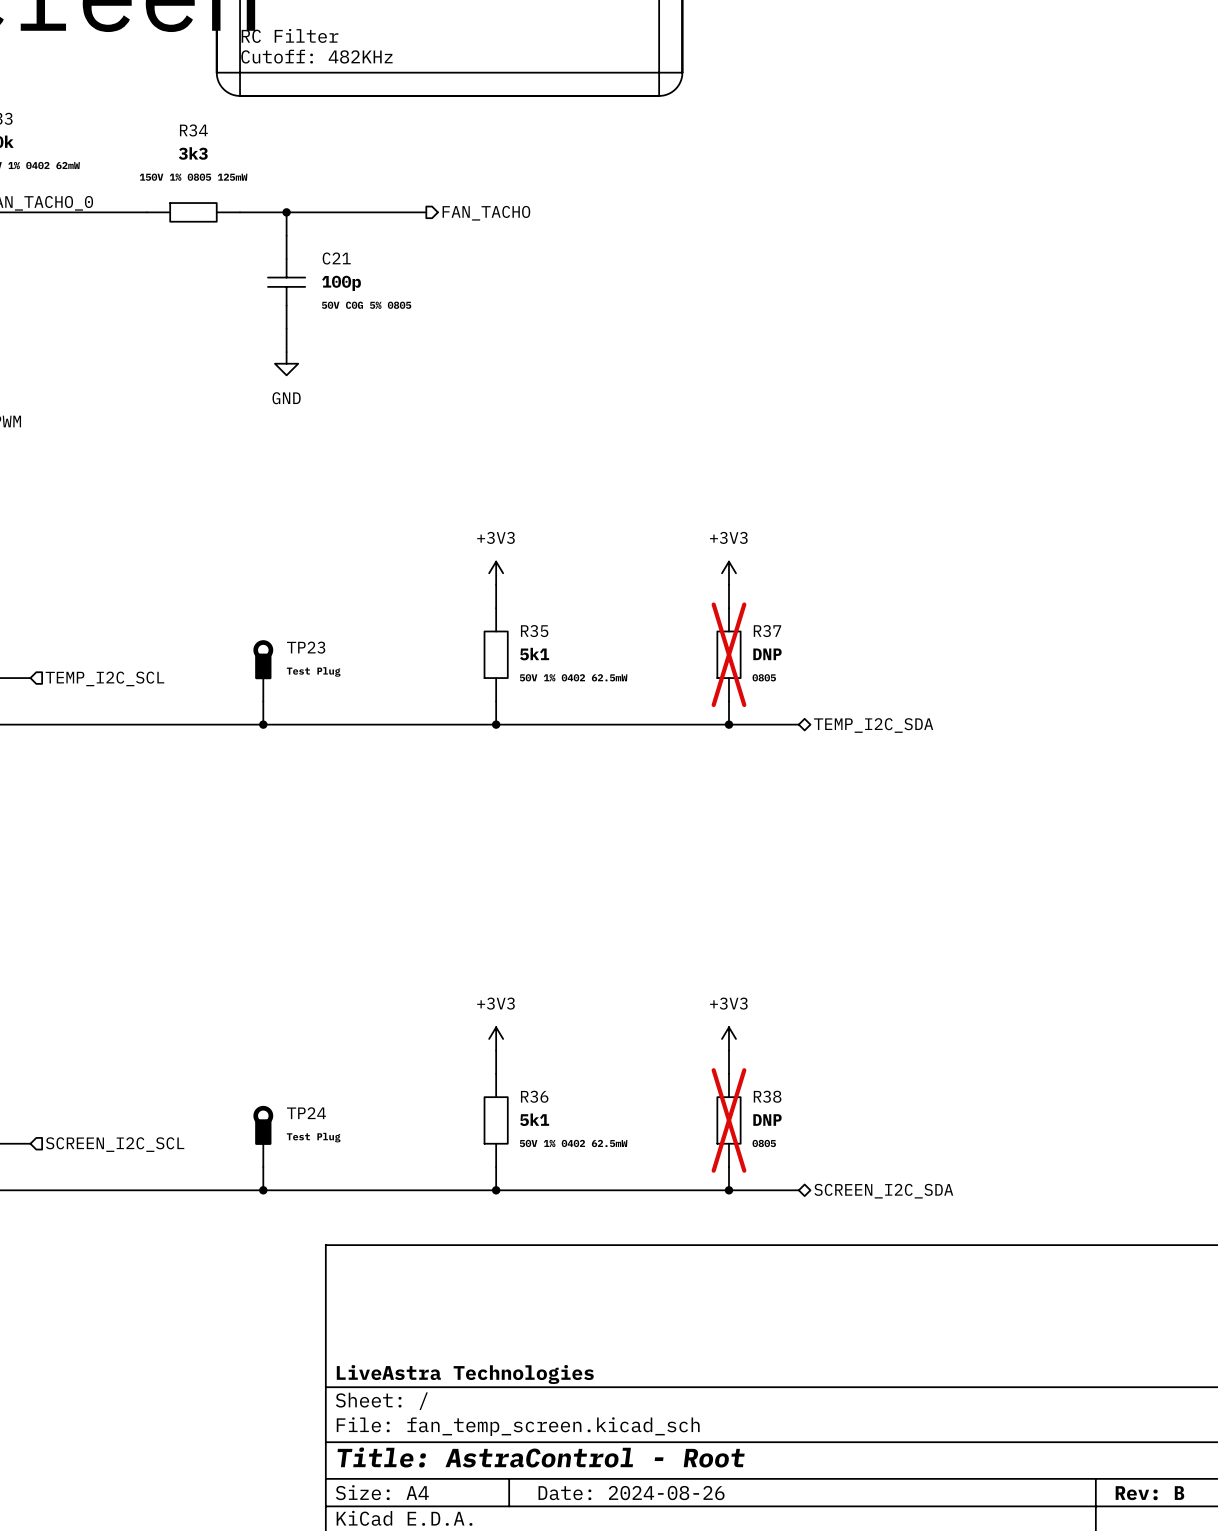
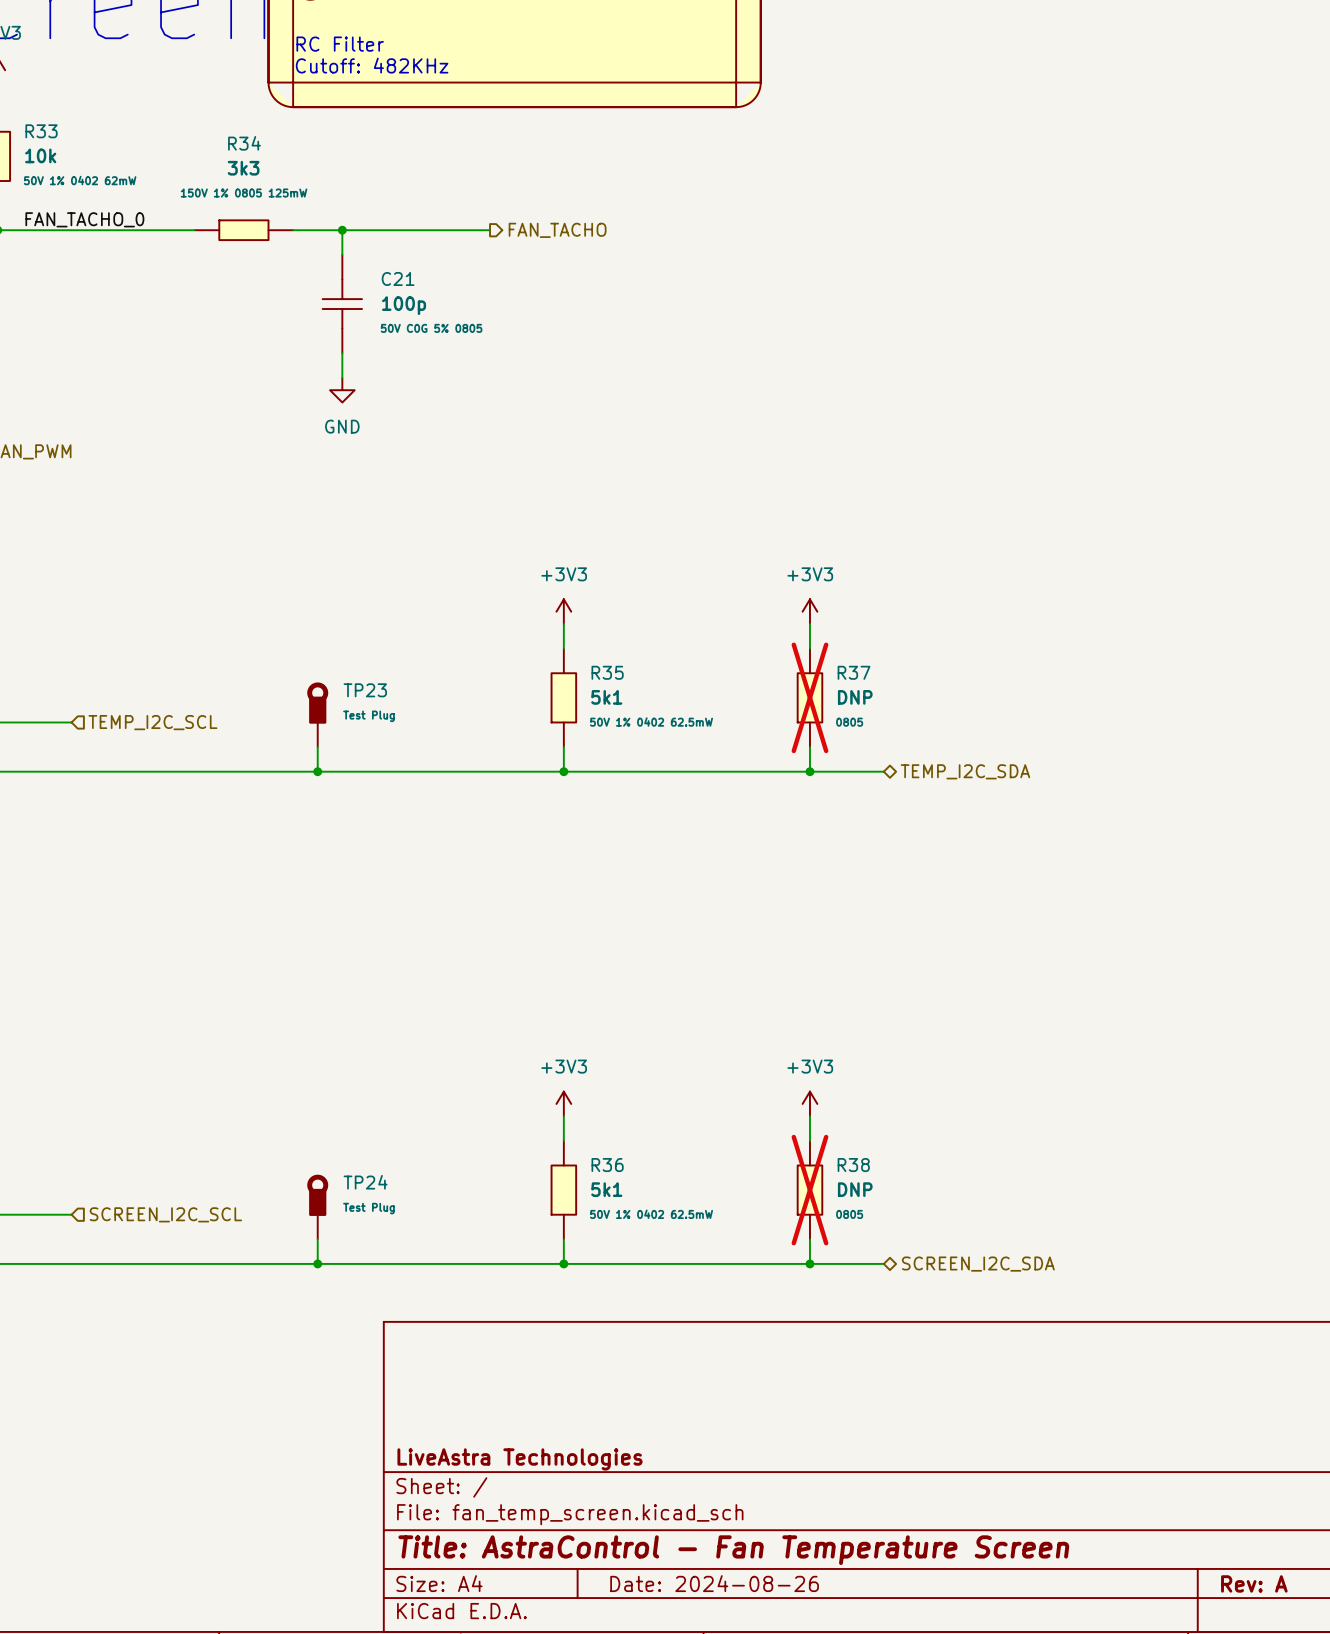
title block: Title: AstraControl - Root (541, 1457) -> Title: AstraControl - Fan Temperature Screen (733, 1550)
title block: Rev: B (1149, 1493) -> Rev: A (1254, 1583)

